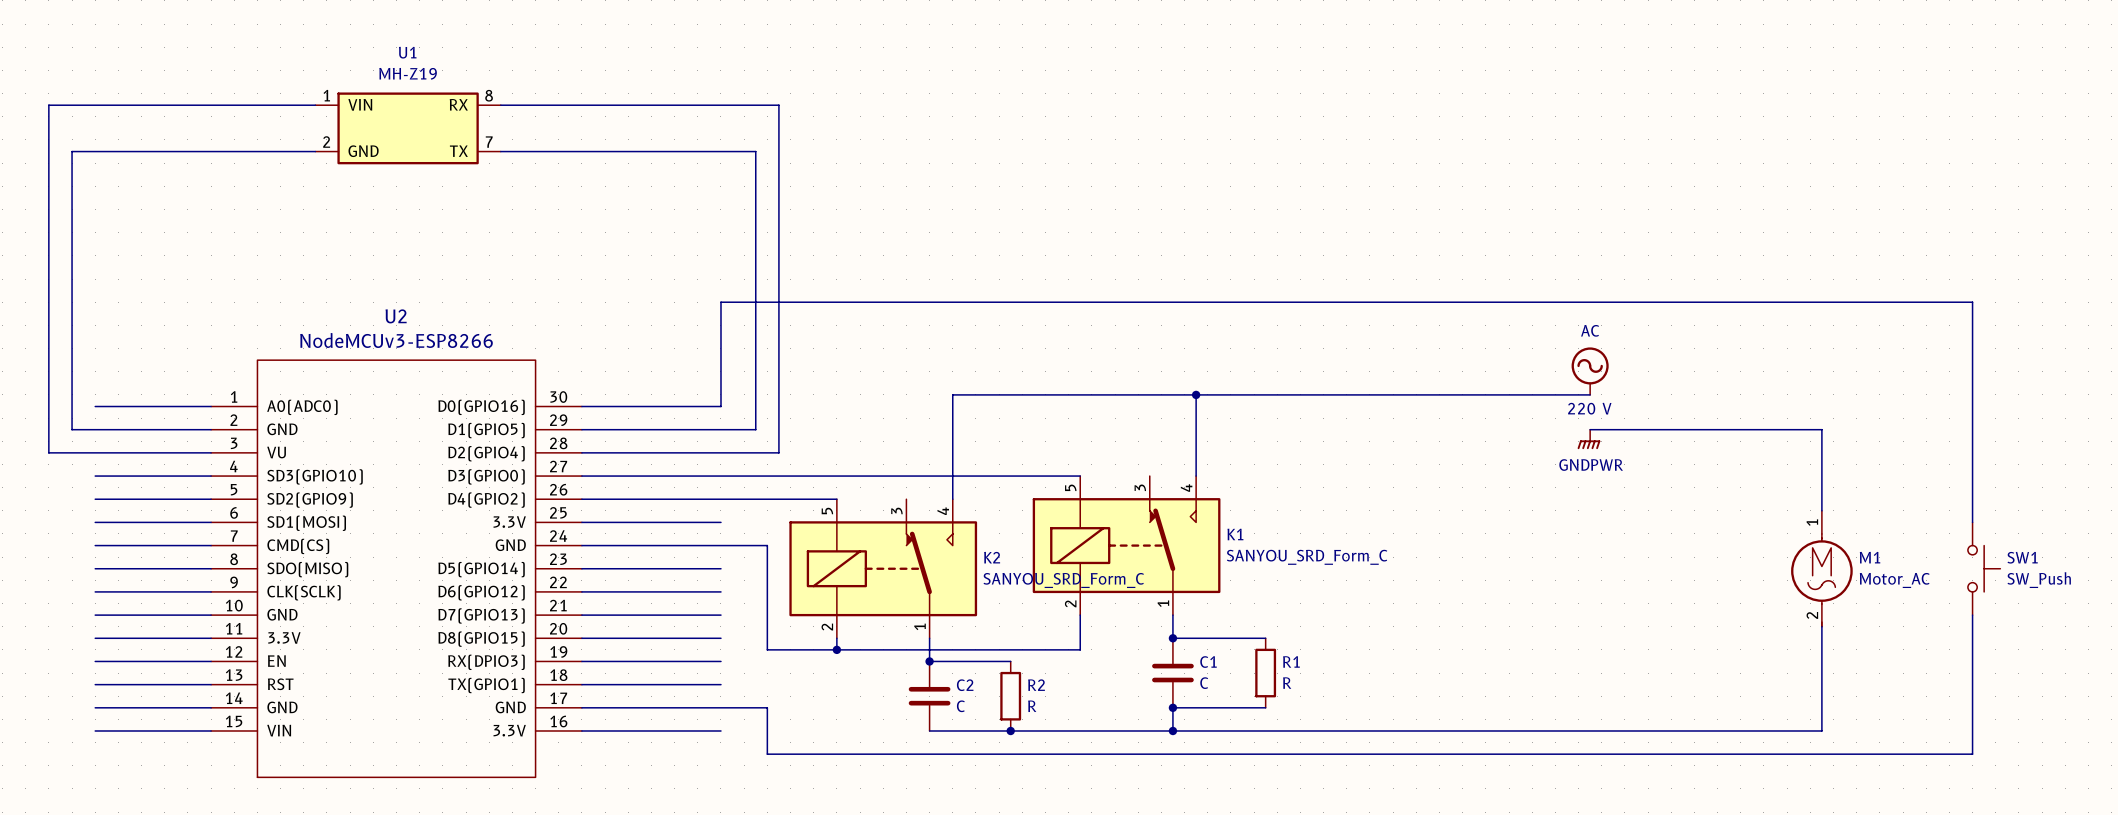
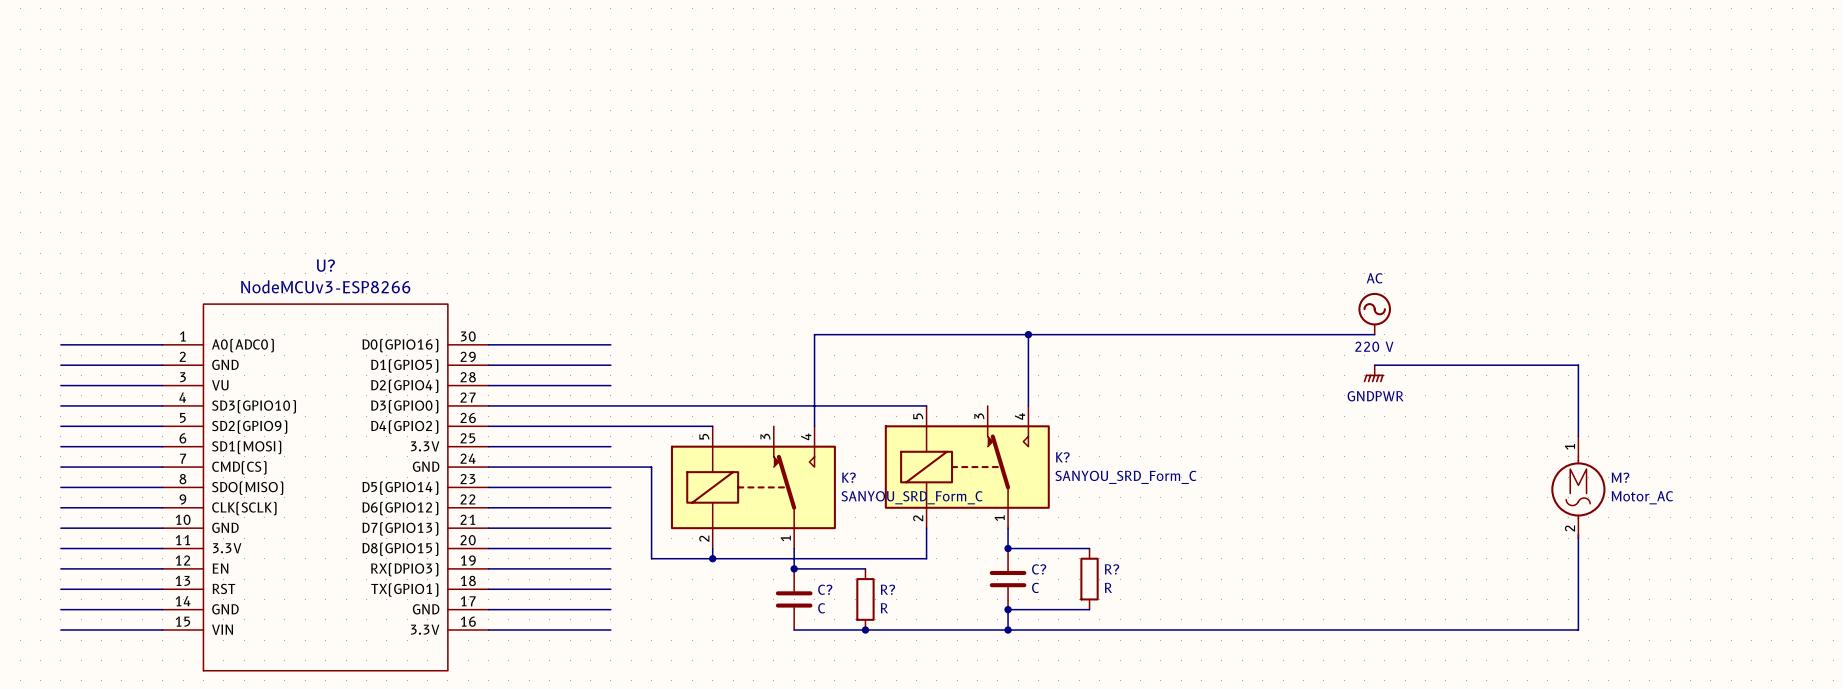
wire: (315, 105) (48, 105) (48, 452) (95, 452) -> none
wire: (500, 105) (778, 105) (778, 452) (720, 452) -> none
U1: MH-Z19 (408, 128) -> none
wire: (315, 151) (72, 151) (72, 429) (95, 429) -> none
wire: (500, 151) (755, 151) (755, 429) (720, 429) -> none
U2 name: U2 (396, 316) -> U? (325, 265)
wire: (720, 406) (720, 302) (1972, 302) (1972, 522) -> none
K1 name: K1 (1235, 534) -> K? (1062, 457)
K2 name: K2 (992, 557) -> K? (848, 477)
M1 name: M1 (1870, 557) -> M? (1620, 477)
SW1: SW_Push (1984, 568) -> none
wire: (1972, 615) (1972, 754) (767, 754) (767, 707) (720, 707) -> none
R1 name: R1 (1291, 661) -> R? (1112, 569)
C1 name: C1 (1208, 662) -> C? (1039, 569)
C2 name: C2 (965, 685) -> C? (825, 589)
R2 name: R2 (1036, 685) -> R? (887, 589)

